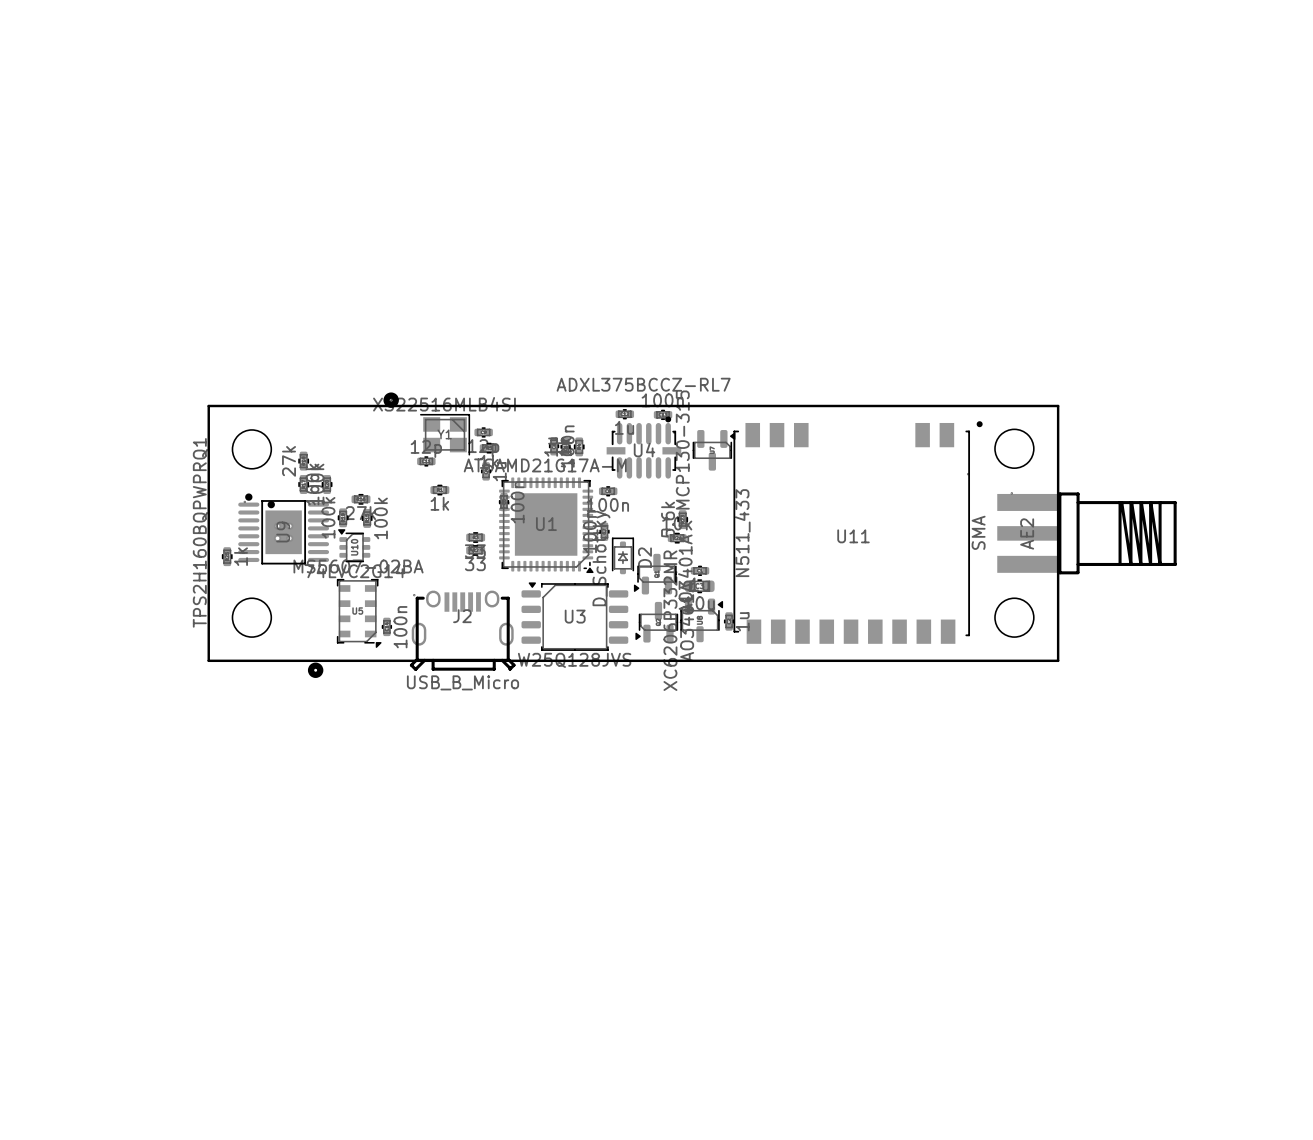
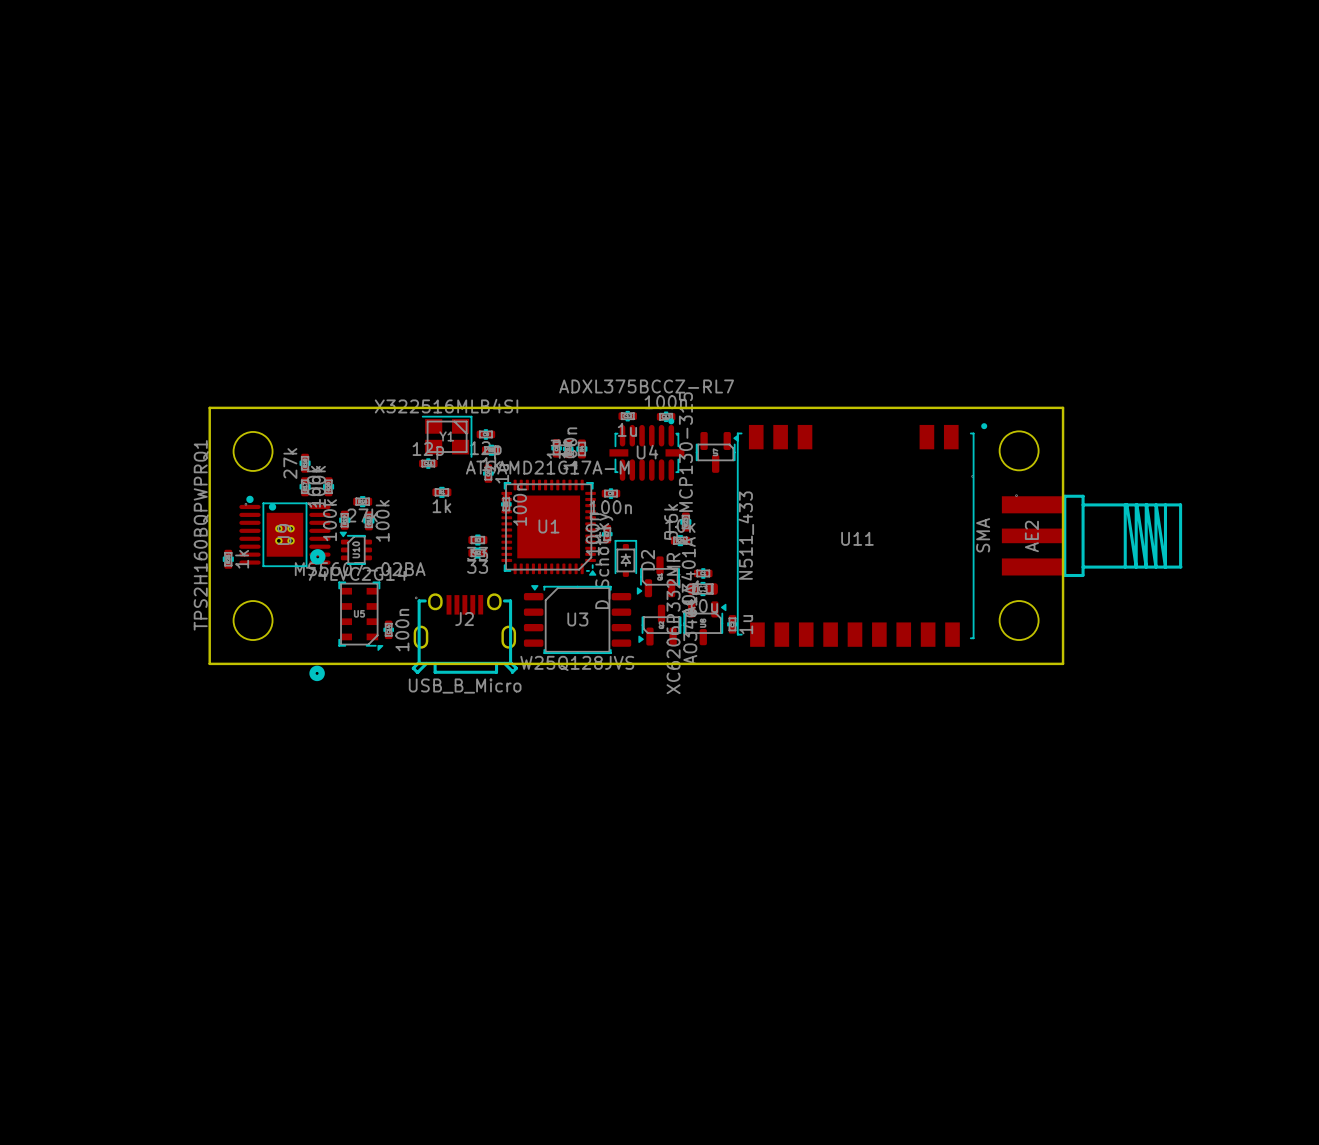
part position: (391, 400) -> (317, 556)

